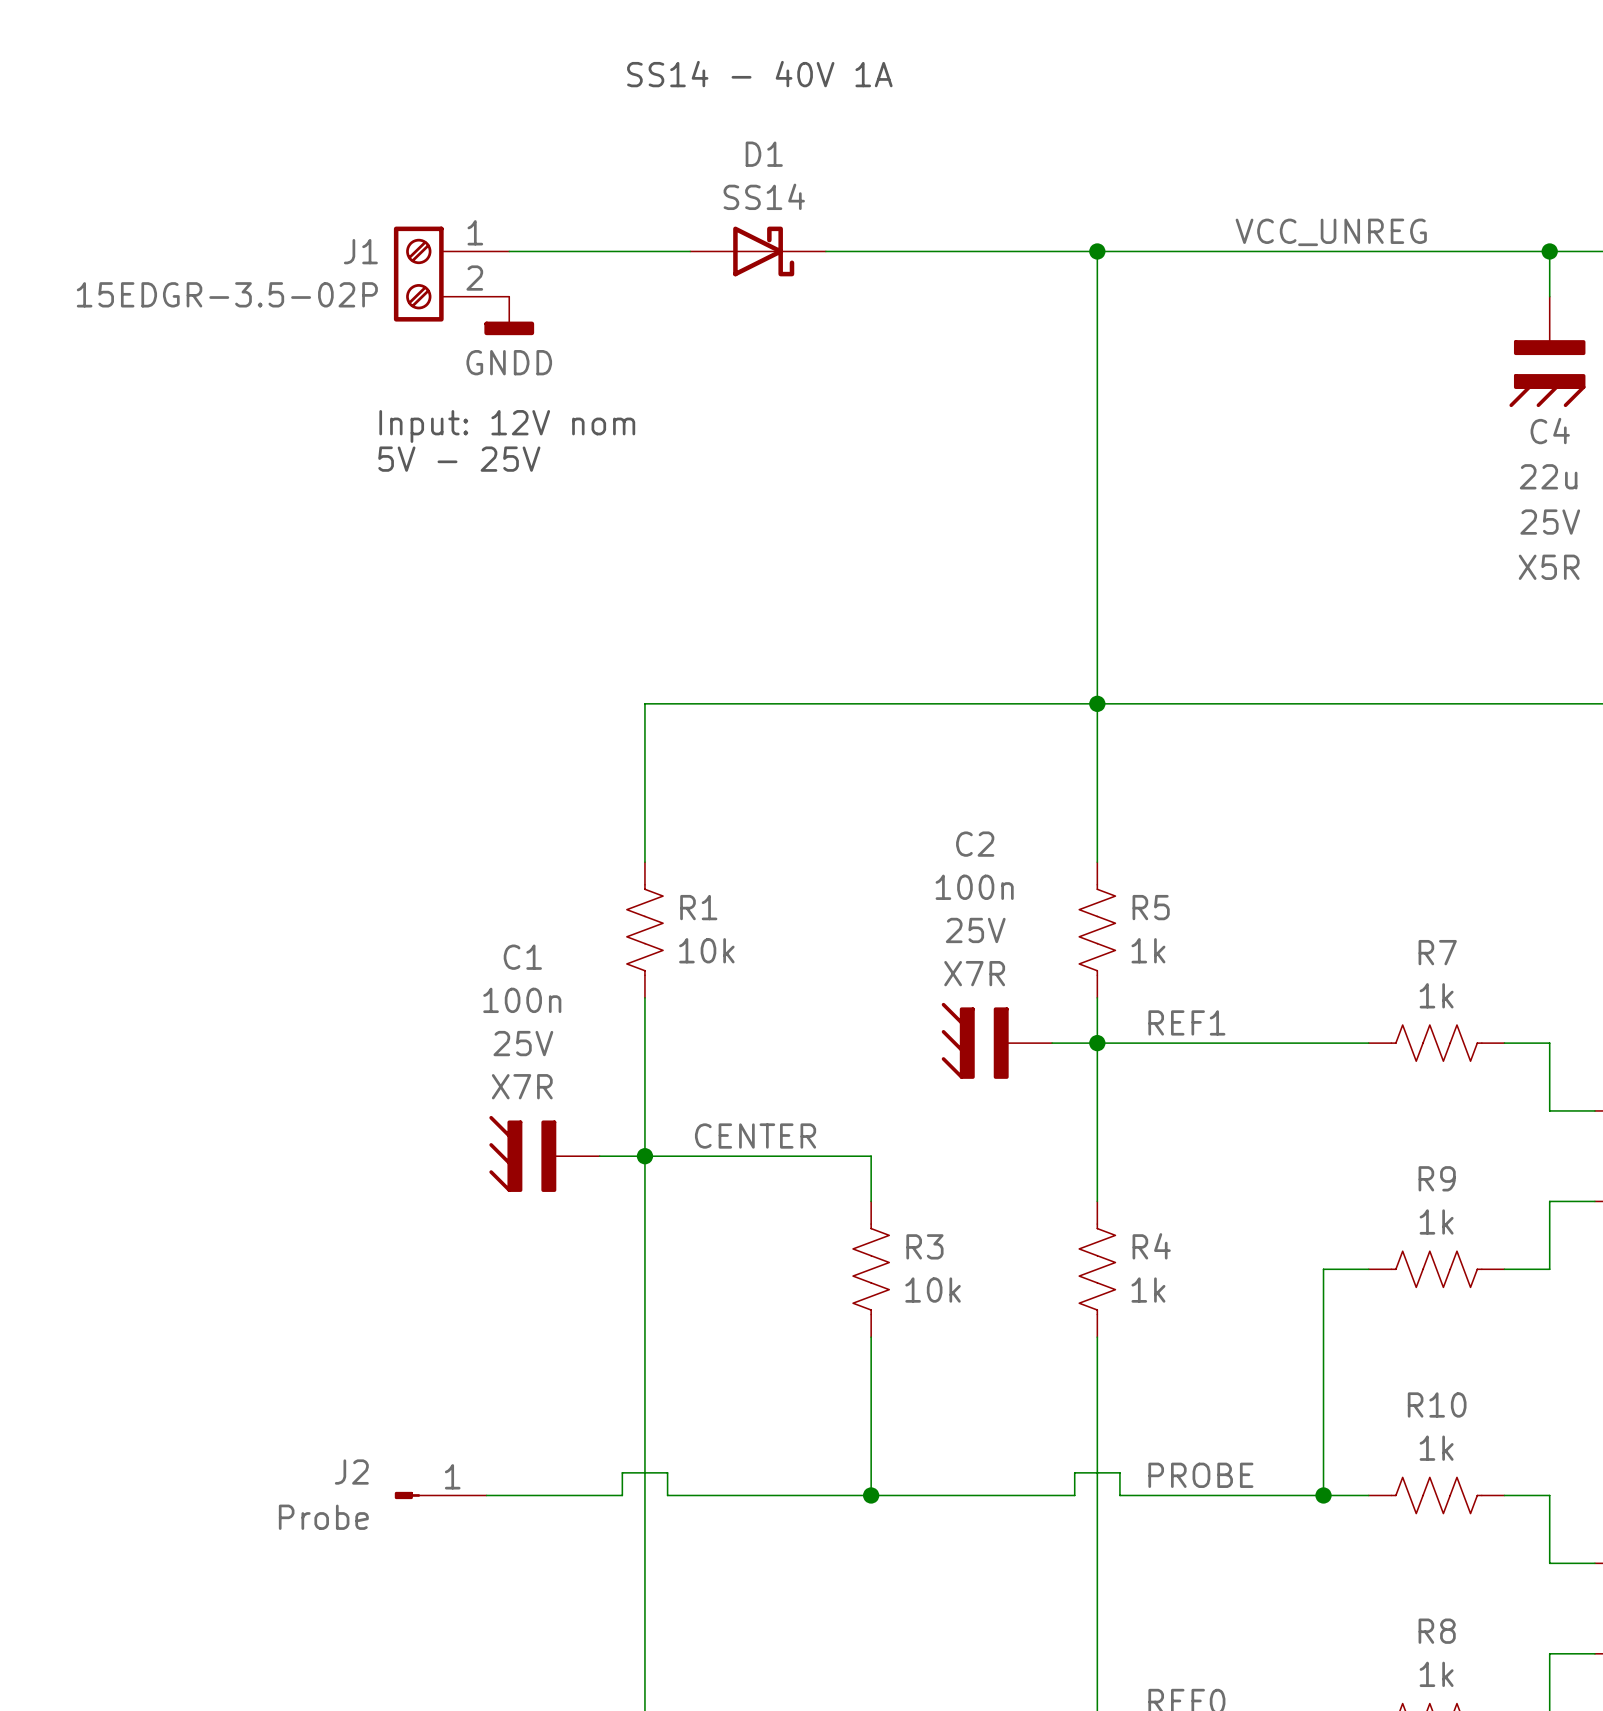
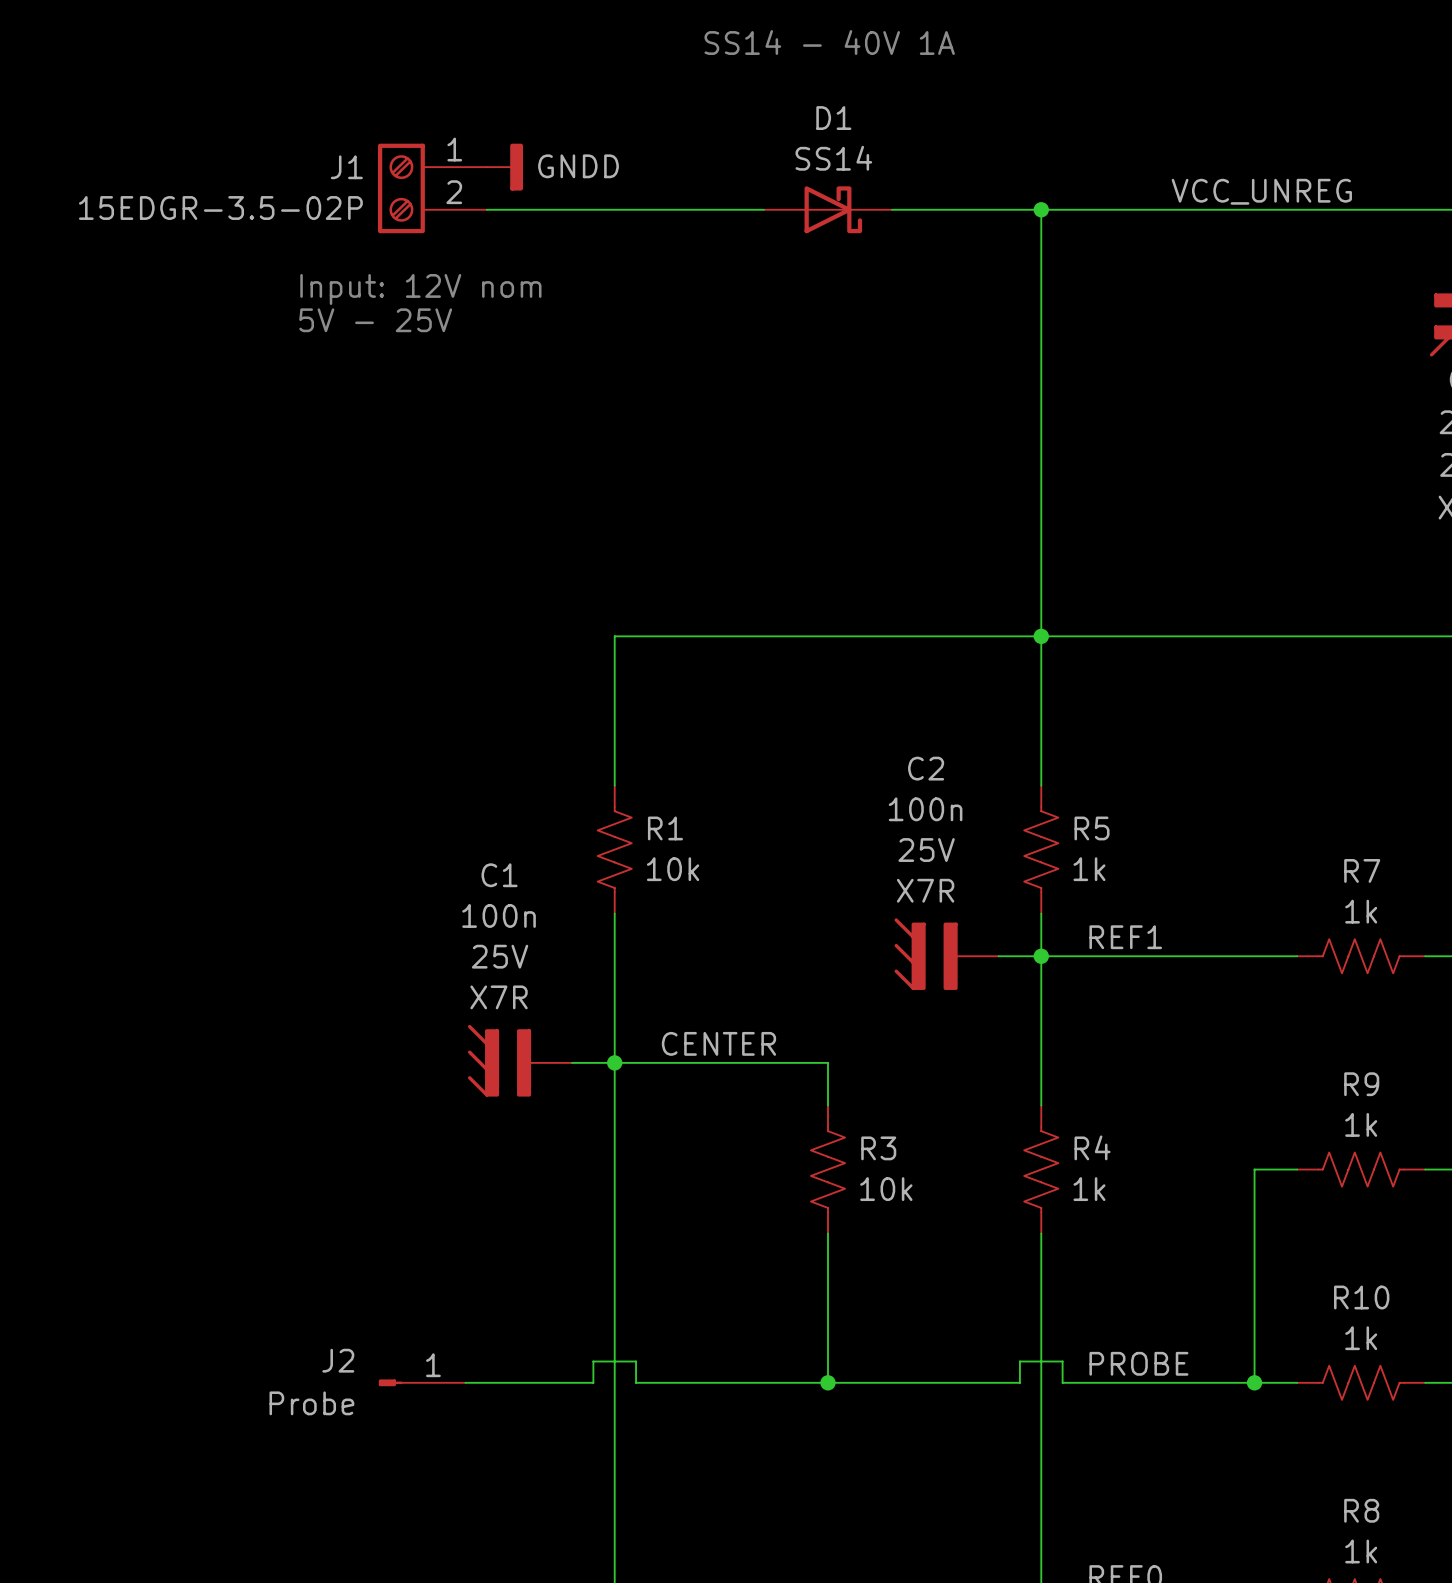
text position: SS14 - 40V 1A (759, 74) -> SS14 - 40V 1A (829, 42)
D1 position: (758, 251) -> (827, 209)
J1 position: (451, 274) -> (432, 188)
power symbol rotation: 0° (509, 315) -> 90° counterclockwise (504, 167)
power symbol position: GNDD (509, 315) -> GNDD (504, 167)
power symbol text position: GNDD (509, 362) -> GNDD (578, 166)
text position: Input: 12V nom (507, 426) -> Input: 12V nom (420, 289)
text position: 5V - 25V (459, 459) -> 5V - 25V (375, 320)

